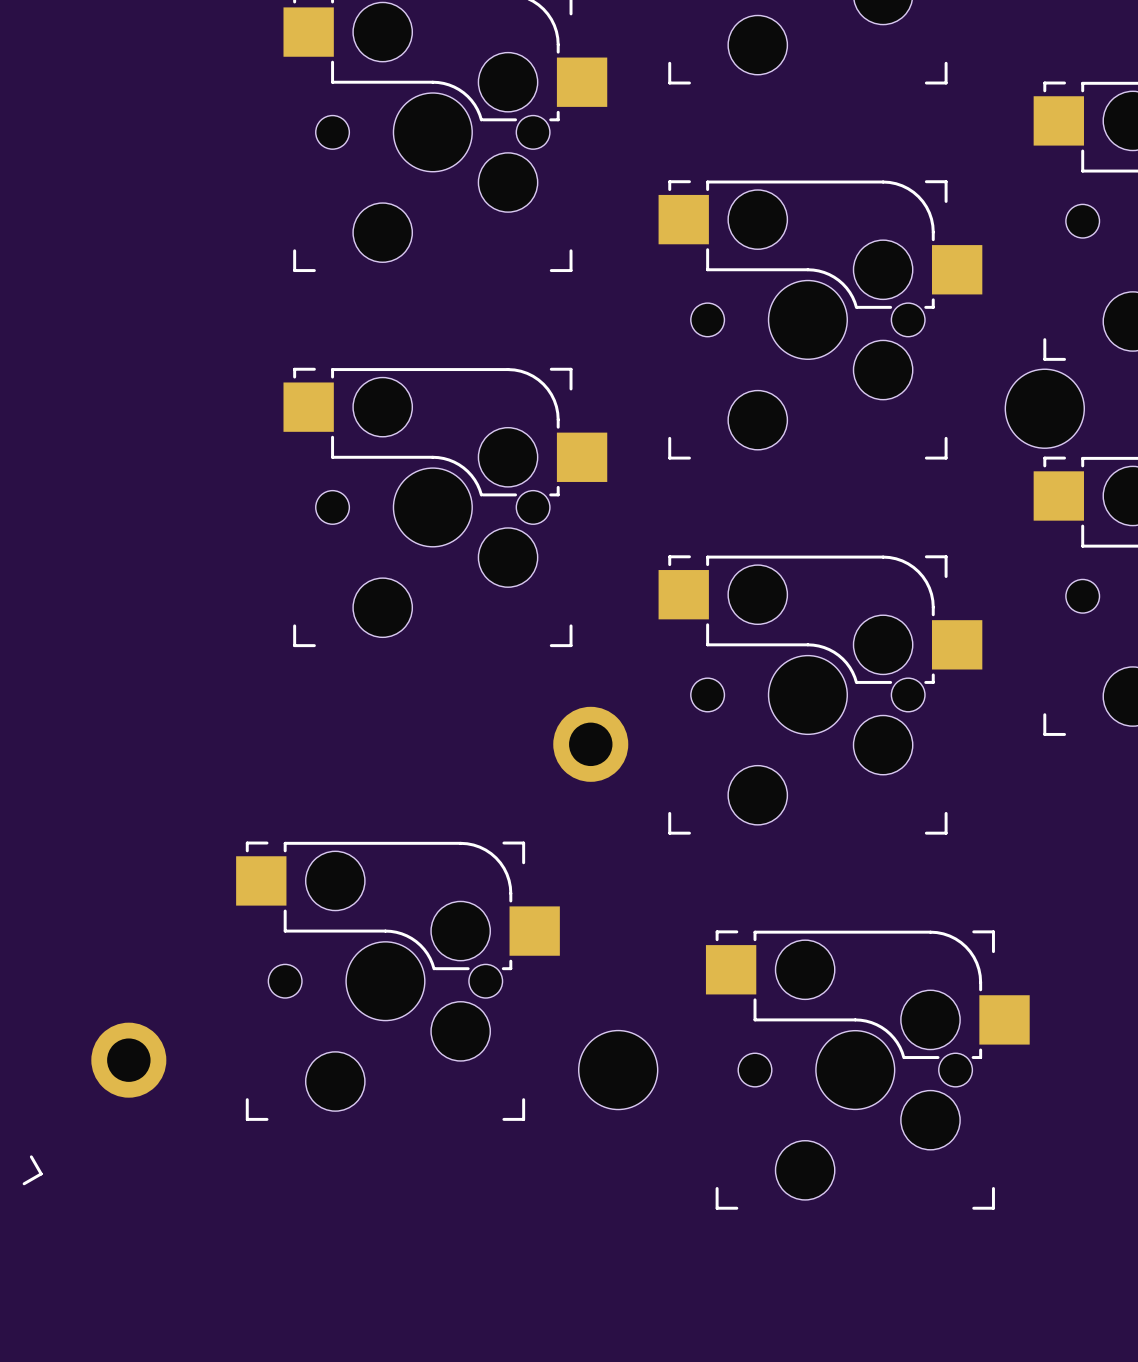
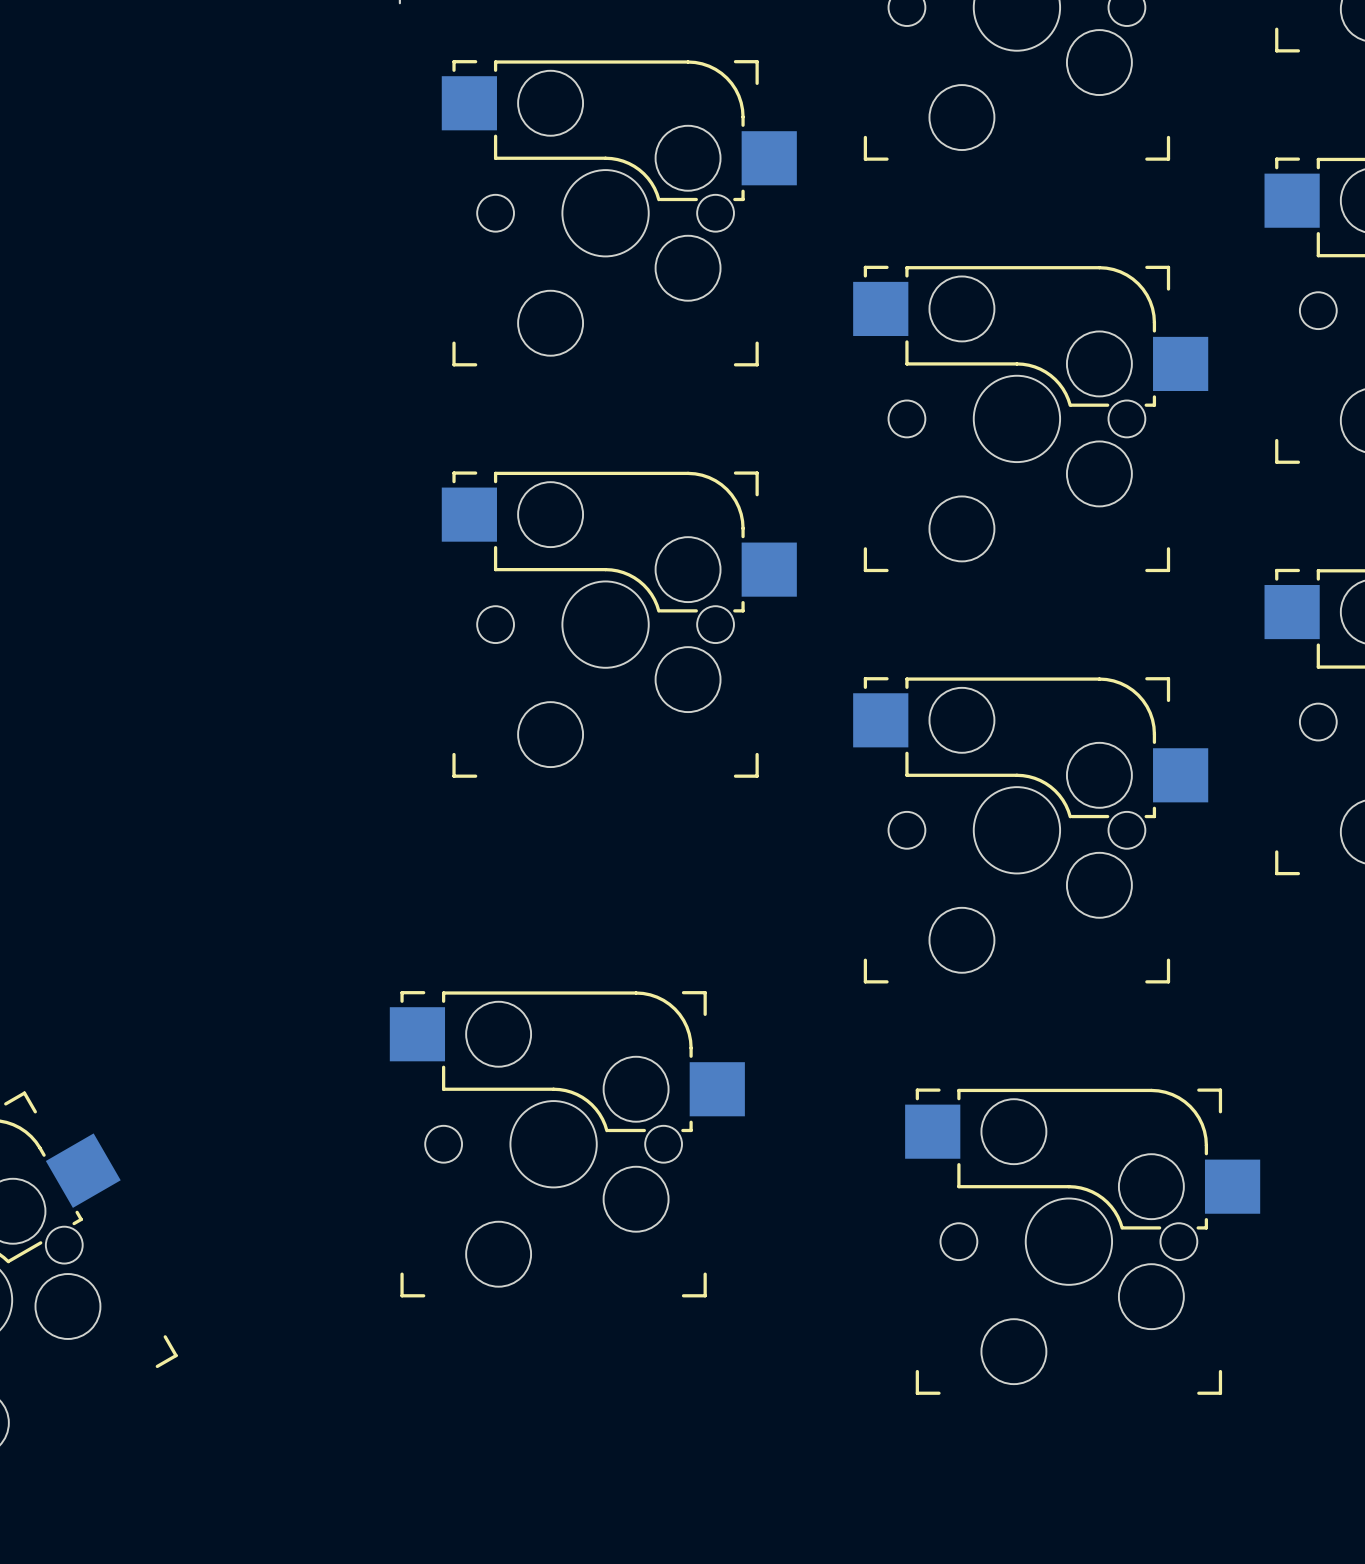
part: (1044, 408) -> none
part: (590, 744) -> none
part: (128, 1060) -> none
part: (618, 1070) -> none

